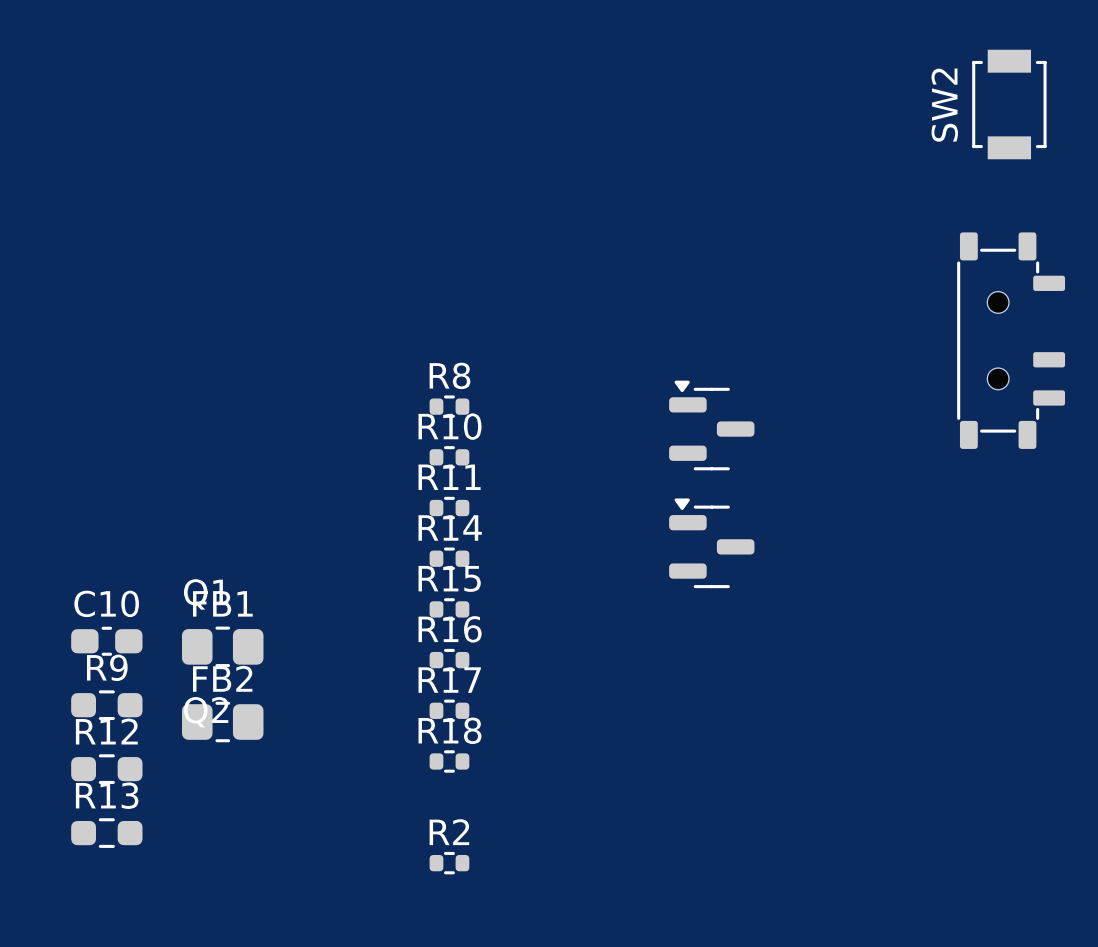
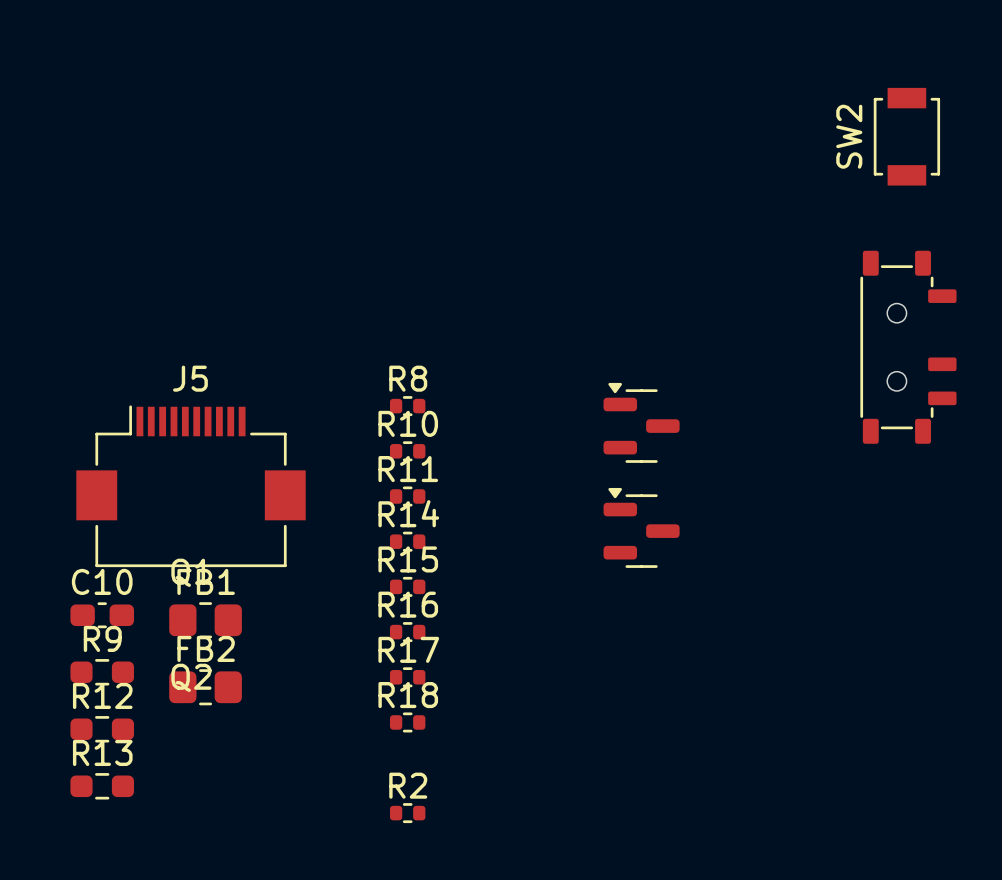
J5: none -> (191, 486)

